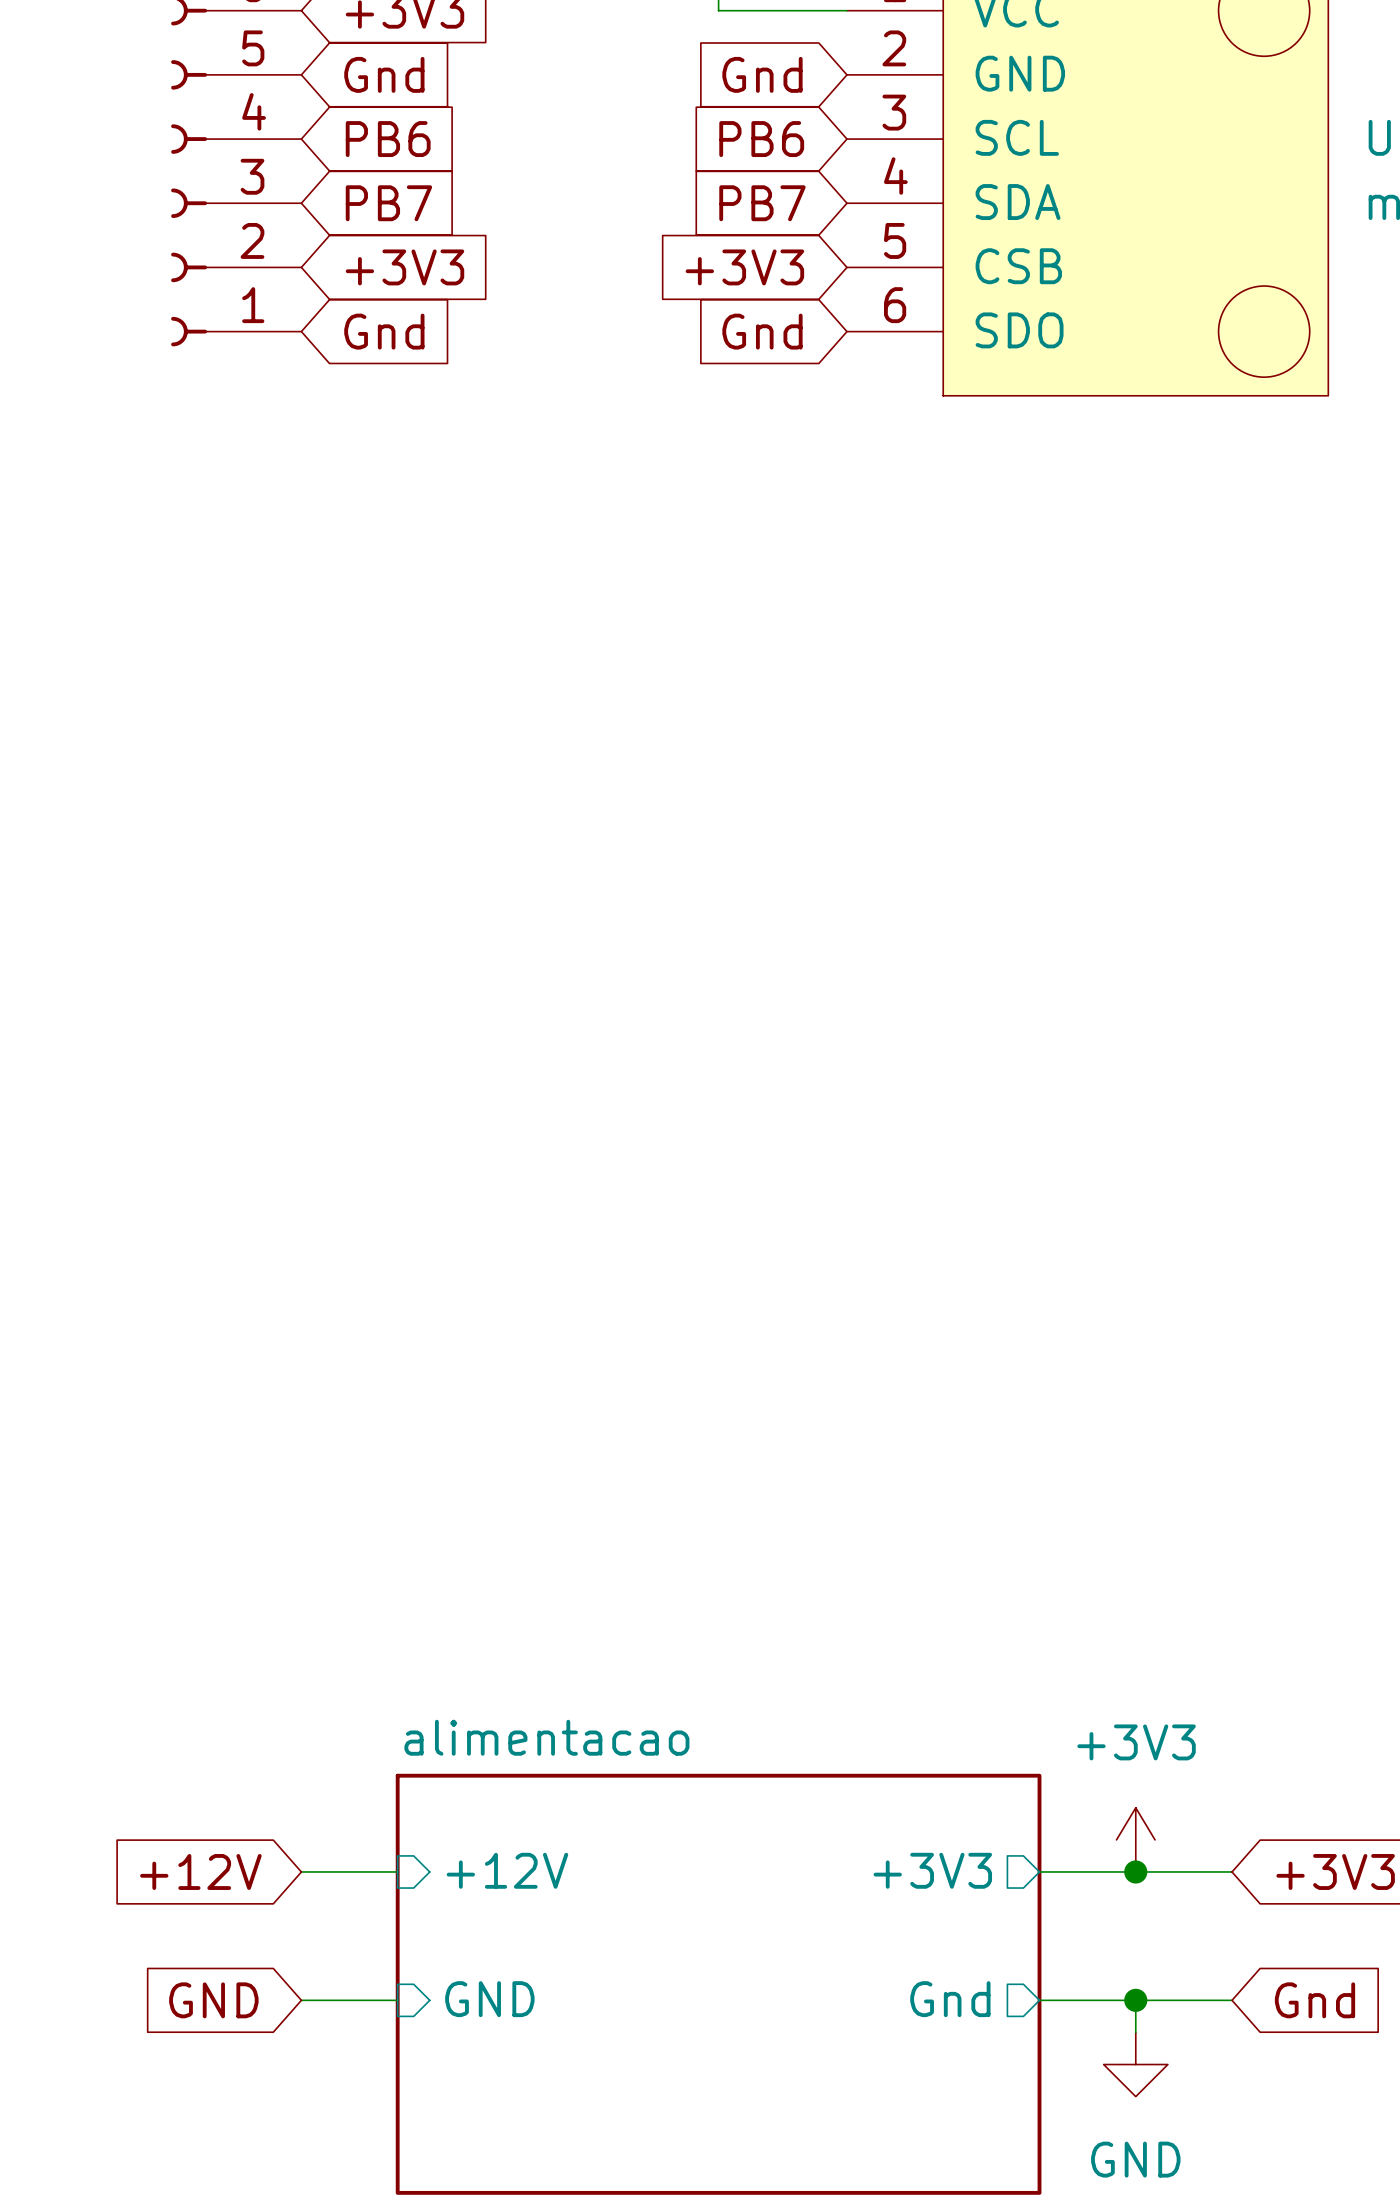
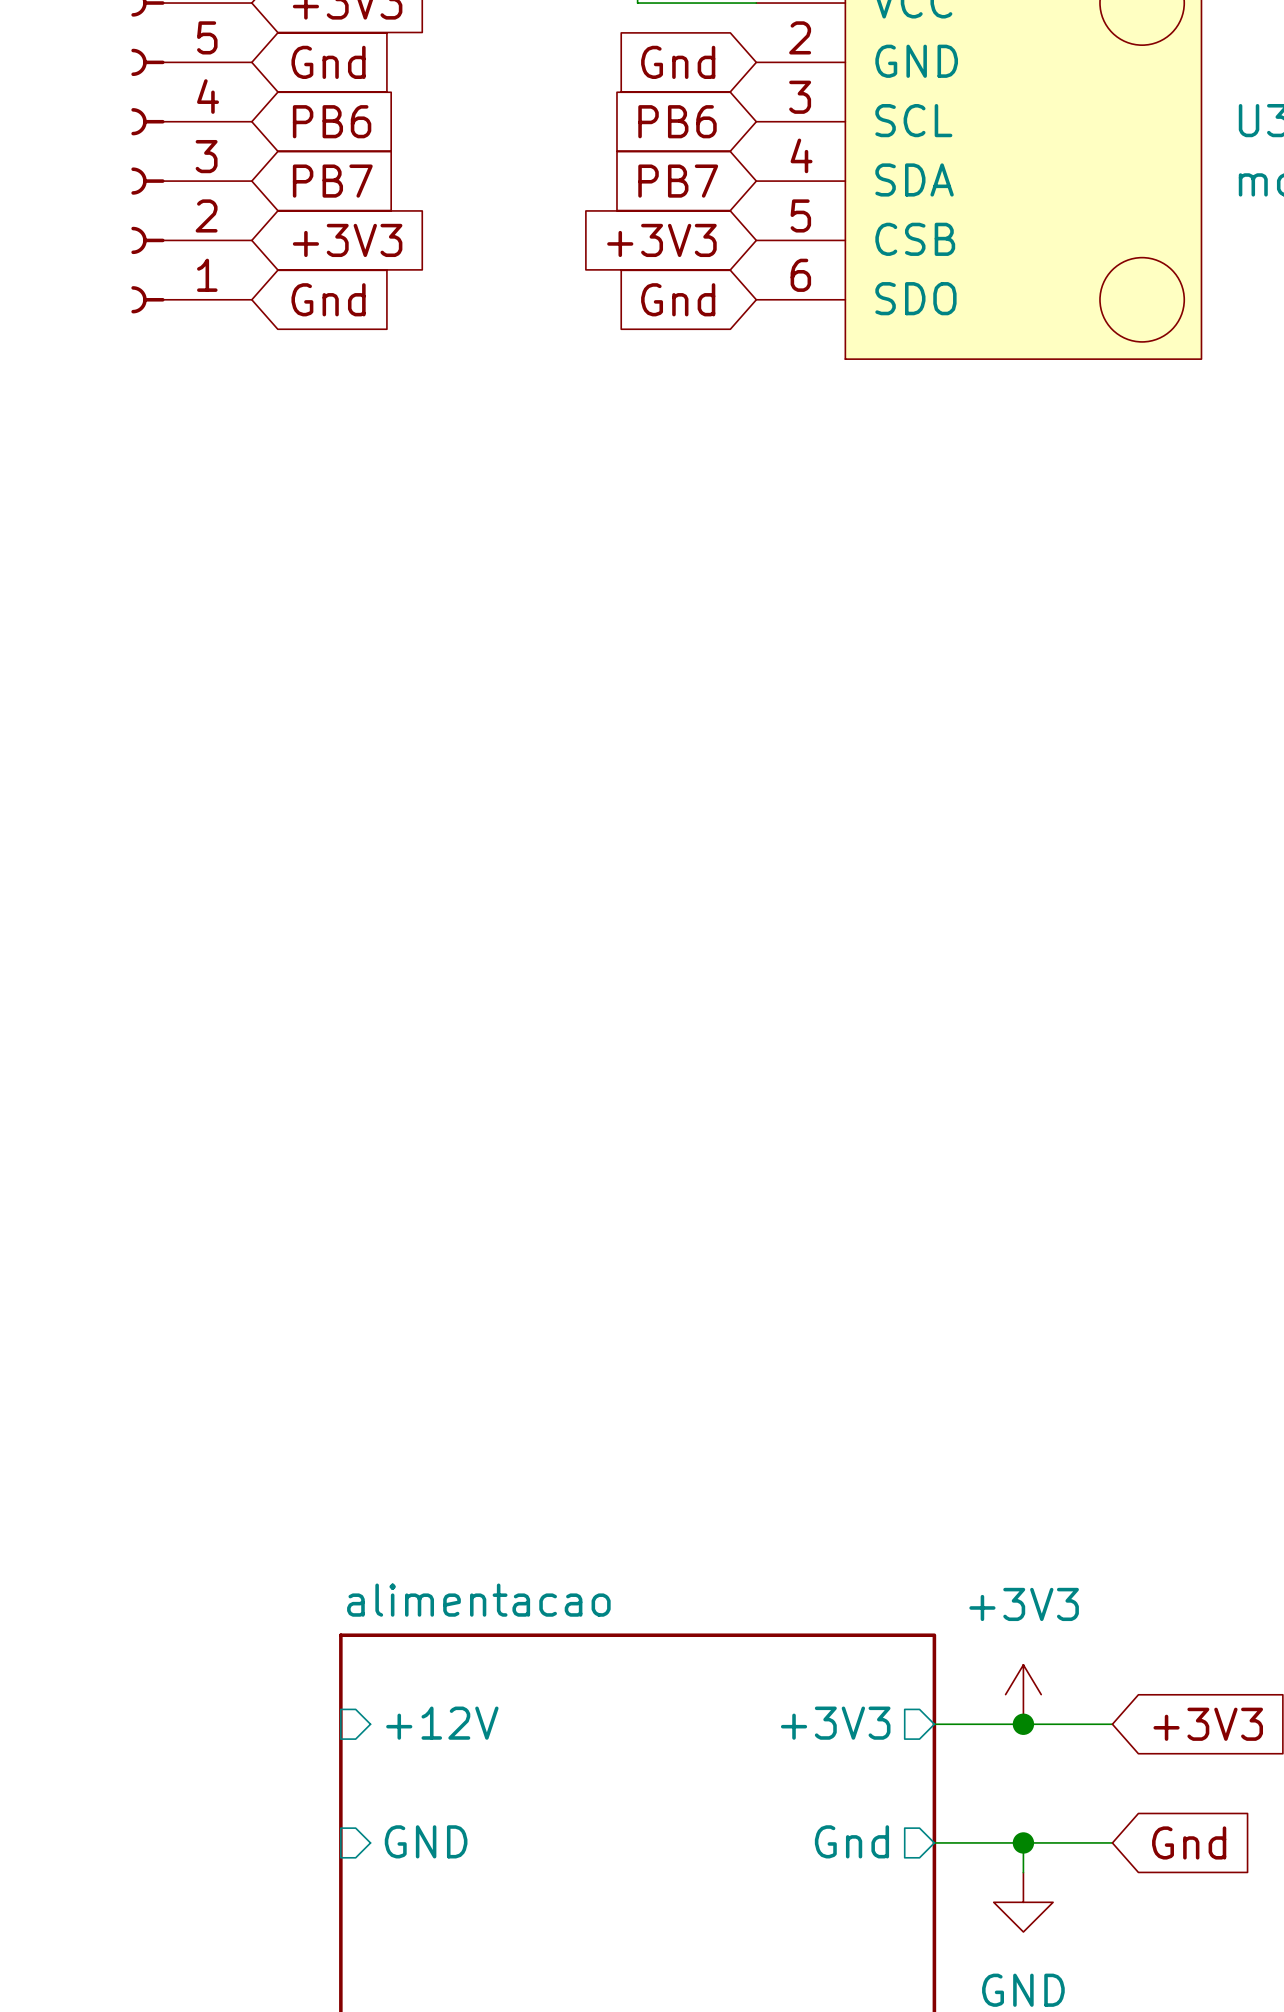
global label: +12V (200, 1871) -> none
wire: (301, 1871) (397, 1871) -> none
global label: GND (213, 2000) -> none
wire: (301, 2000) (397, 2000) -> none

